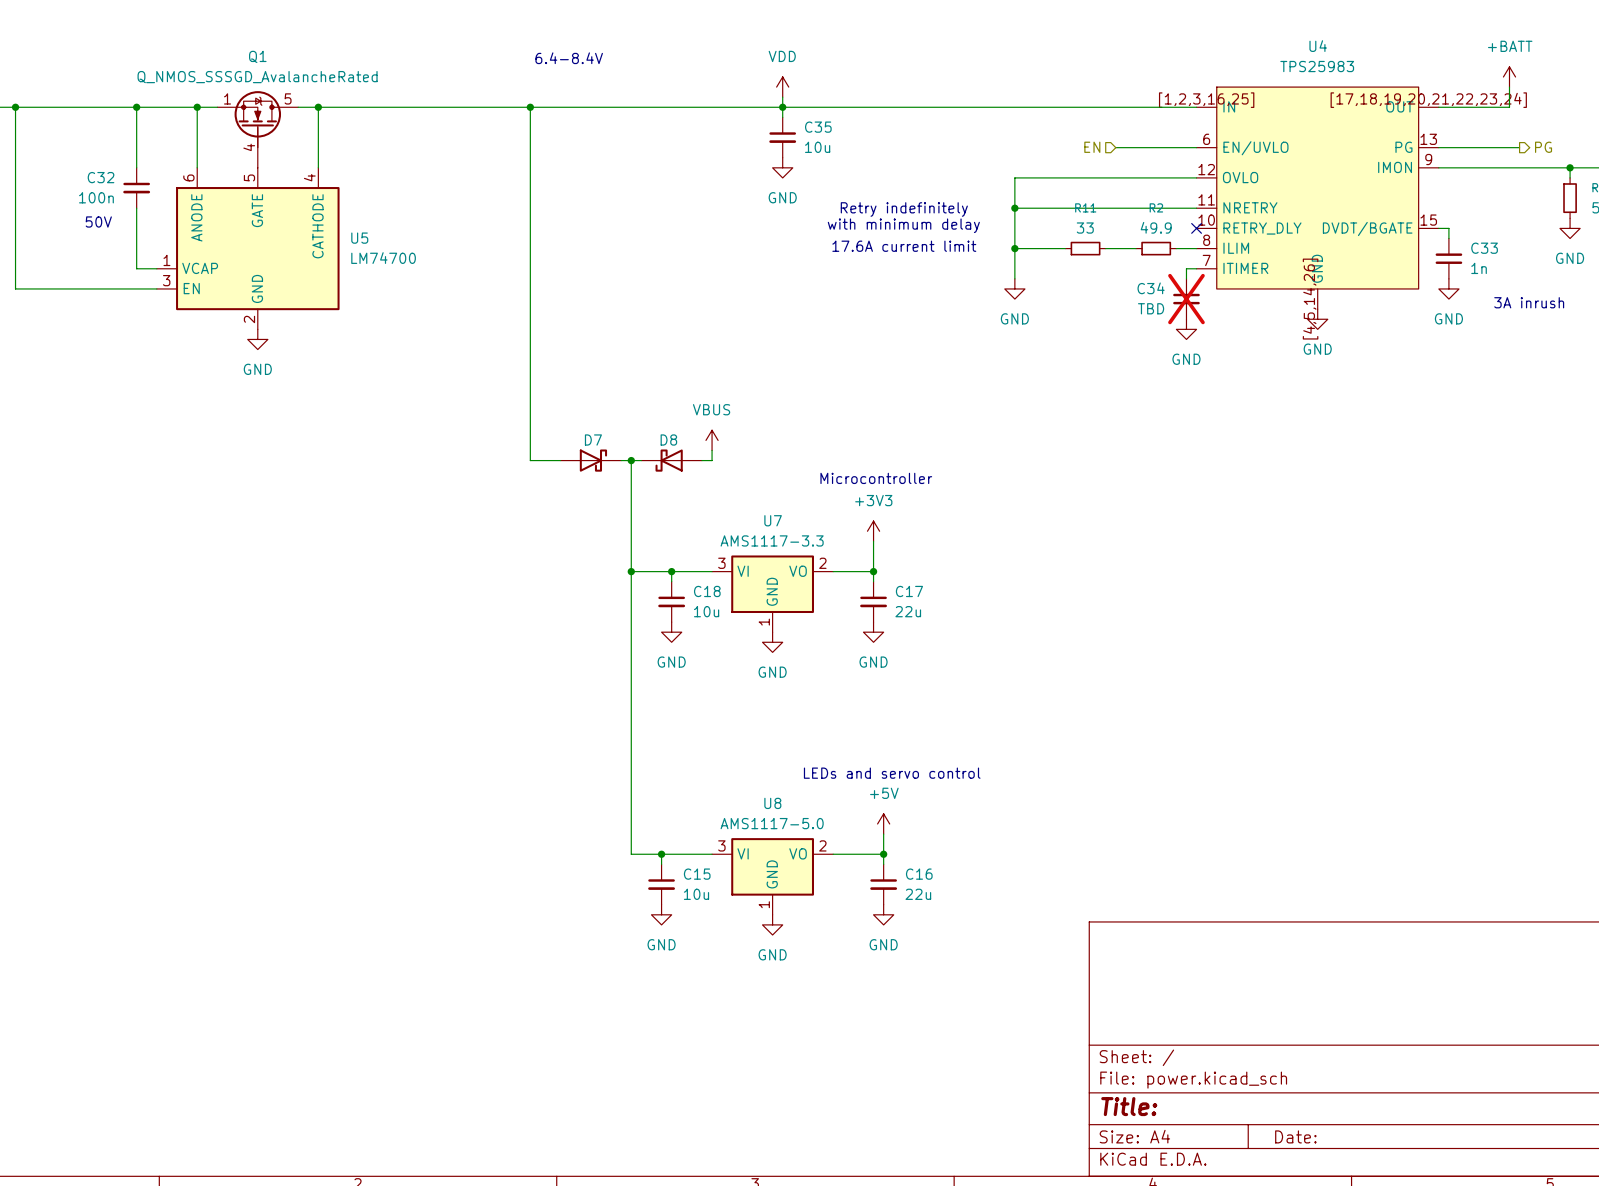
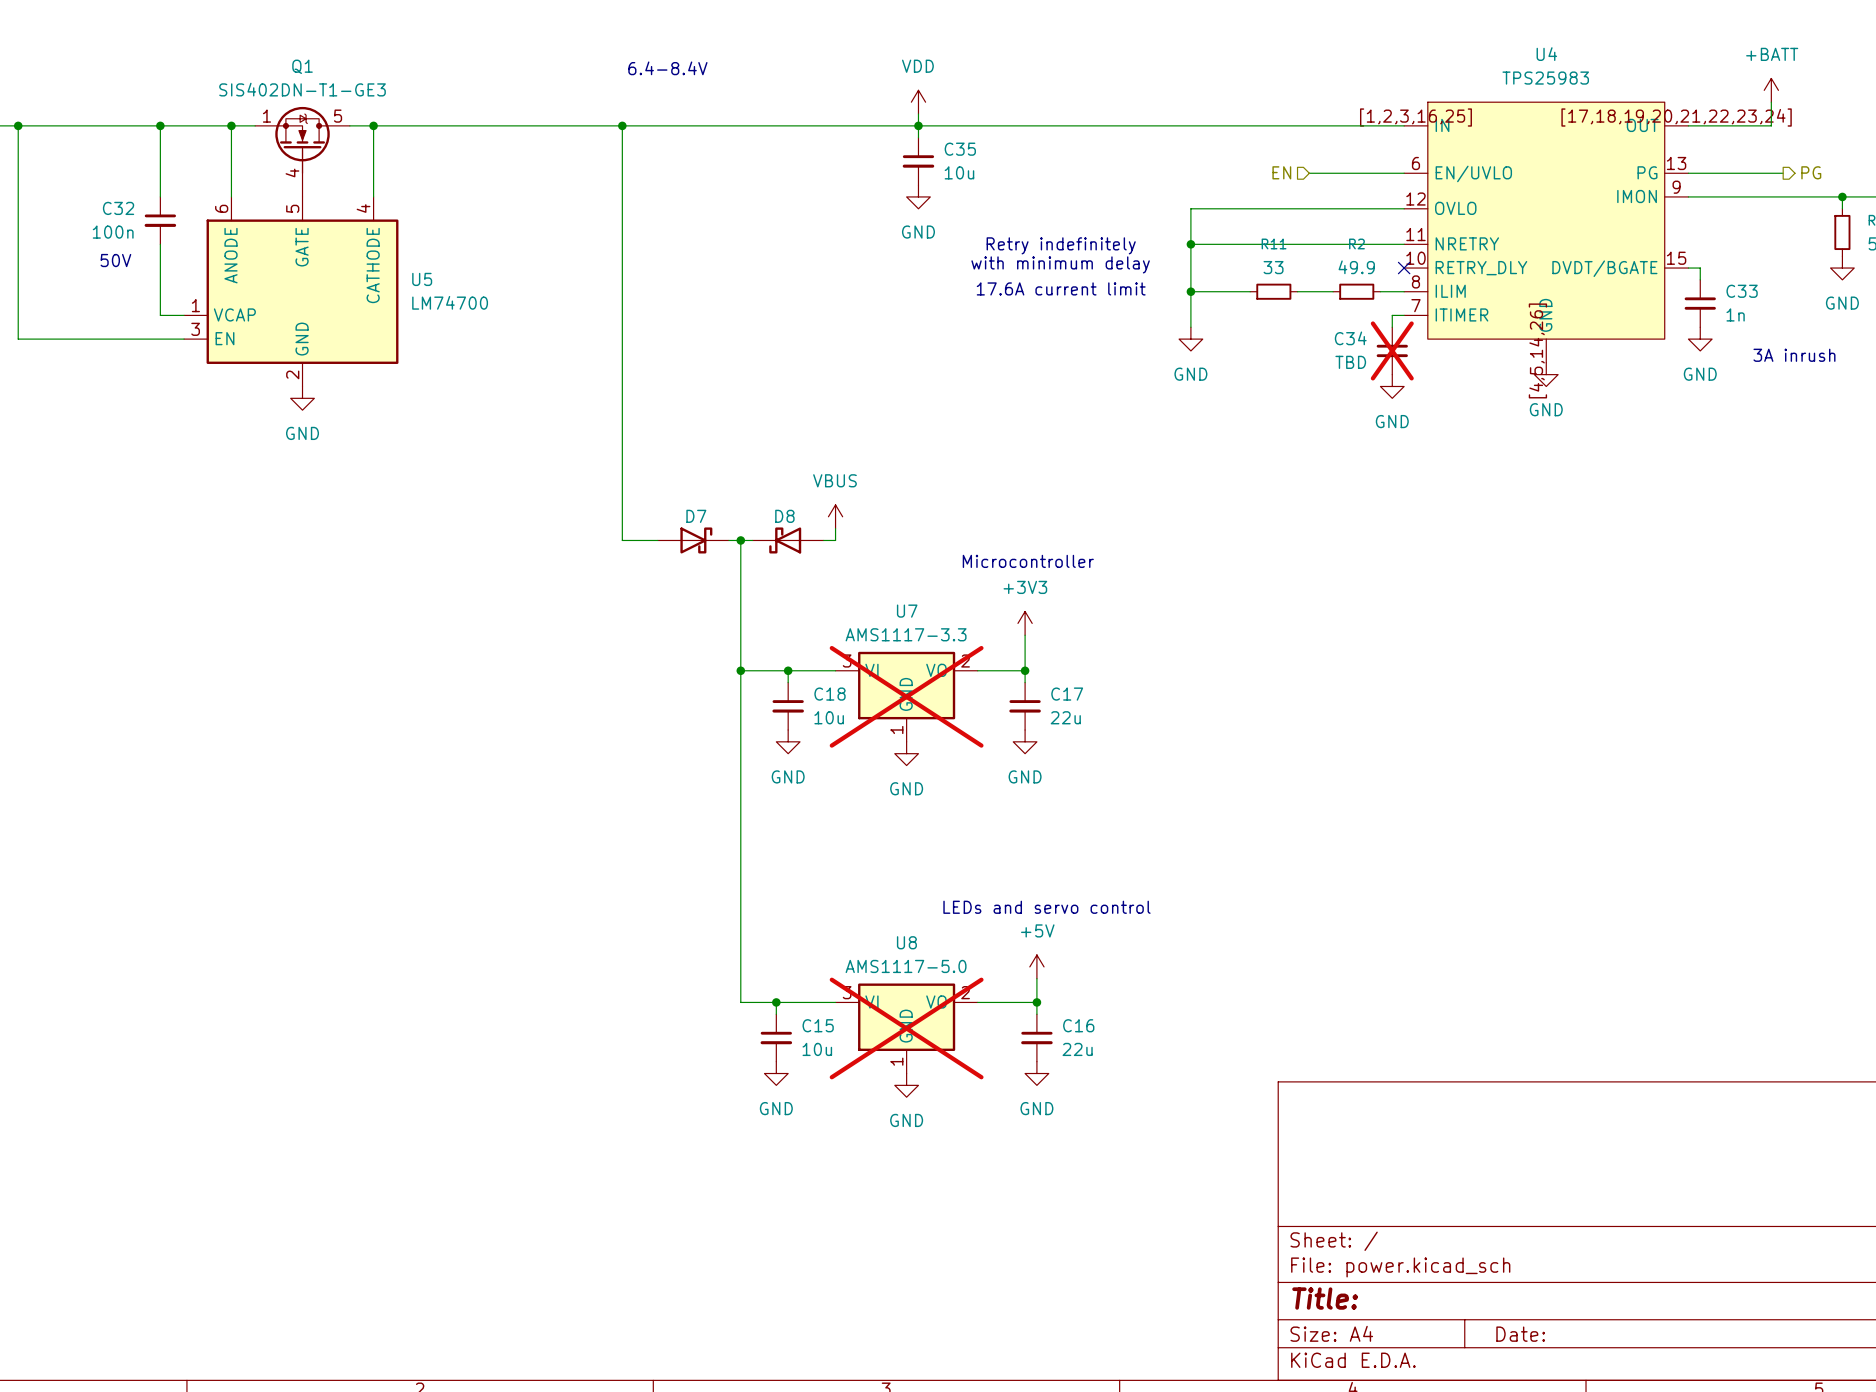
Q1 value: Q_NMOS_SSSGD_AvalancheRated (257, 77) -> SIS402DN-T1-GE3 (302, 89)
U7 do-not-place cross: none -> (906, 696)
U8 do-not-place cross: none -> (906, 1028)

